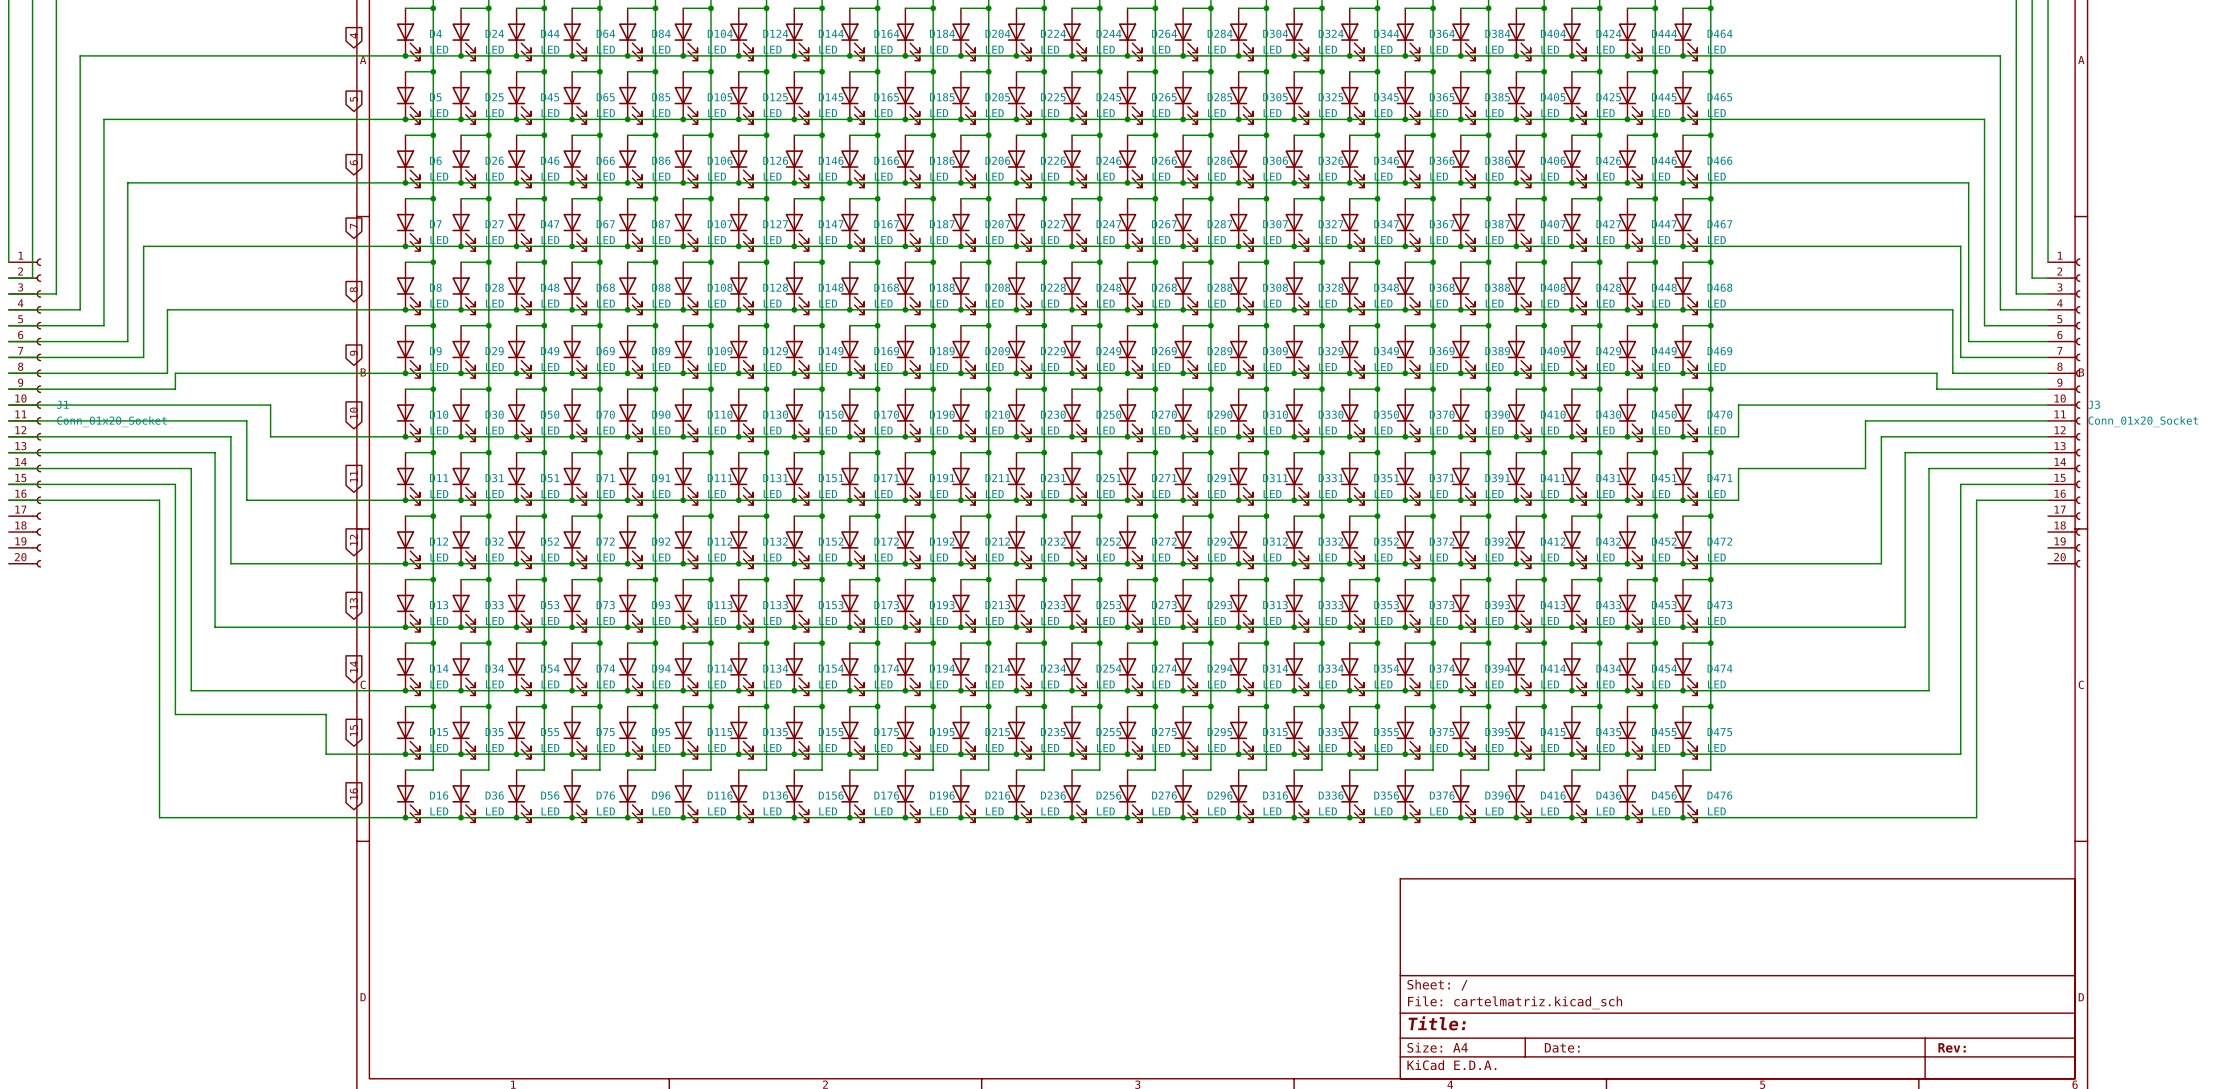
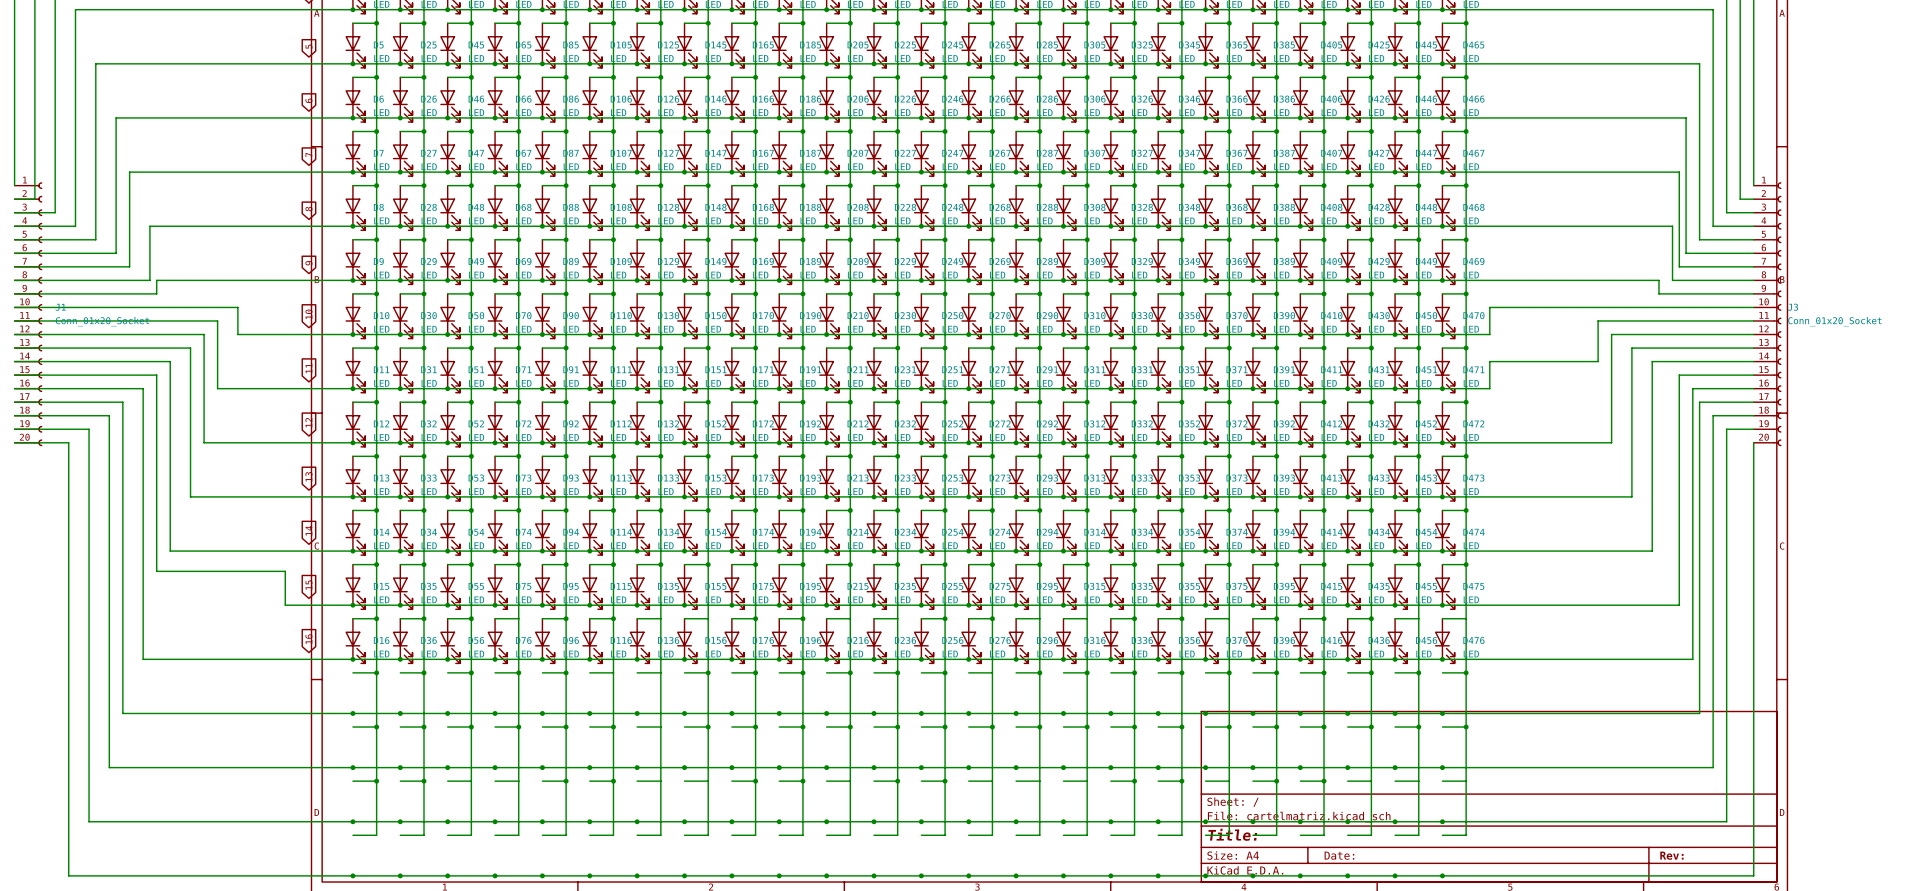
wire: none -> (14, 402) (122, 402) (122, 713) (1699, 713) (1699, 402) (1753, 402)
wire: none -> (14, 415) (109, 415) (109, 767) (1713, 767) (1713, 415) (1753, 415)
wire: none -> (14, 429) (89, 429) (89, 821) (1726, 821) (1726, 429) (1753, 429)
wire: none -> (14, 442) (68, 442) (68, 875) (1753, 875) (1753, 442)
wire: none -> (376, 618) (376, 835) (352, 835)
junction: none -> (376, 618)
wire: none -> (423, 618) (423, 835) (400, 835)
junction: none -> (423, 618)
wire: none -> (471, 618) (471, 835) (447, 835)
junction: none -> (471, 618)
wire: none -> (518, 618) (518, 835) (495, 835)
wire: none -> (566, 618) (566, 835) (542, 835)
junction: none -> (566, 618)
wire: none -> (613, 618) (613, 835) (589, 835)
junction: none -> (613, 618)
wire: none -> (660, 618) (660, 835) (637, 835)
wire: none -> (708, 618) (708, 835) (684, 835)
wire: none -> (755, 618) (755, 835) (731, 835)
junction: none -> (755, 618)
wire: none -> (802, 618) (802, 835) (779, 835)
junction: none -> (802, 618)
wire: none -> (850, 618) (850, 835) (826, 835)
wire: none -> (897, 618) (897, 835) (874, 835)
wire: none -> (945, 618) (945, 835) (921, 835)
junction: none -> (945, 618)
wire: none -> (992, 618) (992, 835) (968, 835)
junction: none -> (992, 618)
wire: none -> (1039, 618) (1039, 835) (1016, 835)
wire: none -> (1087, 618) (1087, 835) (1063, 835)
wire: none -> (1134, 618) (1134, 835) (1110, 835)
junction: none -> (1134, 618)
wire: none -> (1181, 618) (1181, 835) (1158, 835)
junction: none -> (1181, 618)
wire: none -> (1229, 618) (1229, 835) (1205, 835)
wire: none -> (1276, 618) (1276, 835) (1252, 835)
junction: none -> (1276, 618)
wire: none -> (1324, 618) (1324, 835) (1300, 835)
junction: none -> (1324, 618)
wire: none -> (1371, 618) (1371, 835) (1347, 835)
junction: none -> (1371, 618)
wire: none -> (1418, 618) (1418, 835) (1395, 835)
wire: none -> (1466, 618) (1466, 835) (1442, 835)
wire: none -> (352, 672) (376, 672)
junction: none -> (376, 672)
wire: none -> (400, 672) (423, 672)
junction: none -> (423, 672)
wire: none -> (447, 672) (471, 672)
junction: none -> (471, 672)
wire: none -> (495, 672) (518, 672)
junction: none -> (518, 672)
wire: none -> (542, 672) (566, 672)
junction: none -> (566, 672)
wire: none -> (589, 672) (613, 672)
wire: none -> (637, 672) (660, 672)
wire: none -> (684, 672) (708, 672)
junction: none -> (708, 672)
wire: none -> (731, 672) (755, 672)
junction: none -> (755, 672)
wire: none -> (779, 672) (802, 672)
junction: none -> (802, 672)
wire: none -> (826, 672) (850, 672)
junction: none -> (850, 672)
wire: none -> (874, 672) (897, 672)
junction: none -> (897, 672)
wire: none -> (921, 672) (945, 672)
junction: none -> (945, 672)
wire: none -> (968, 672) (992, 672)
wire: none -> (1016, 672) (1039, 672)
junction: none -> (1039, 672)
wire: none -> (1063, 672) (1087, 672)
junction: none -> (1087, 672)
wire: none -> (1110, 672) (1134, 672)
junction: none -> (1134, 672)
wire: none -> (1158, 672) (1181, 672)
junction: none -> (1181, 672)
wire: none -> (1205, 672) (1229, 672)
junction: none -> (1229, 672)
wire: none -> (1252, 672) (1276, 672)
junction: none -> (1276, 672)
wire: none -> (1300, 672) (1324, 672)
junction: none -> (1324, 672)
wire: none -> (1347, 672) (1371, 672)
junction: none -> (1371, 672)
wire: none -> (1395, 672) (1418, 672)
junction: none -> (1418, 672)
wire: none -> (1442, 672) (1466, 672)
junction: none -> (1466, 672)
junction: none -> (352, 713)
junction: none -> (400, 713)
junction: none -> (447, 713)
junction: none -> (495, 713)
junction: none -> (542, 713)
junction: none -> (589, 713)
junction: none -> (637, 713)
junction: none -> (684, 713)
junction: none -> (731, 713)
junction: none -> (779, 713)
junction: none -> (826, 713)
junction: none -> (874, 713)
junction: none -> (921, 713)
junction: none -> (968, 713)
junction: none -> (1016, 713)
junction: none -> (1063, 713)
junction: none -> (1110, 713)
junction: none -> (1158, 713)
junction: none -> (1205, 713)
junction: none -> (1252, 713)
junction: none -> (1300, 713)
junction: none -> (1347, 713)
junction: none -> (1395, 713)
junction: none -> (1442, 713)
wire: none -> (352, 727) (376, 727)
junction: none -> (376, 727)
wire: none -> (400, 727) (423, 727)
junction: none -> (423, 727)
wire: none -> (447, 727) (471, 727)
junction: none -> (471, 727)
wire: none -> (495, 727) (518, 727)
junction: none -> (518, 727)
wire: none -> (542, 727) (566, 727)
junction: none -> (566, 727)
wire: none -> (589, 727) (613, 727)
junction: none -> (613, 727)
wire: none -> (637, 727) (660, 727)
wire: none -> (684, 727) (708, 727)
junction: none -> (708, 727)
wire: none -> (731, 727) (755, 727)
junction: none -> (755, 727)
wire: none -> (779, 727) (802, 727)
junction: none -> (802, 727)
wire: none -> (826, 727) (850, 727)
junction: none -> (850, 727)
wire: none -> (874, 727) (897, 727)
junction: none -> (897, 727)
wire: none -> (921, 727) (945, 727)
junction: none -> (945, 727)
wire: none -> (968, 727) (992, 727)
junction: none -> (992, 727)
wire: none -> (1016, 727) (1039, 727)
junction: none -> (1039, 727)
wire: none -> (1063, 727) (1087, 727)
junction: none -> (1087, 727)
wire: none -> (1110, 727) (1134, 727)
junction: none -> (1134, 727)
wire: none -> (1158, 727) (1181, 727)
junction: none -> (1181, 727)
wire: none -> (1205, 727) (1229, 727)
junction: none -> (1229, 727)
wire: none -> (1252, 727) (1276, 727)
junction: none -> (1276, 727)
wire: none -> (1300, 727) (1324, 727)
junction: none -> (1324, 727)
wire: none -> (1347, 727) (1371, 727)
junction: none -> (1371, 727)
wire: none -> (1395, 727) (1418, 727)
junction: none -> (1418, 727)
wire: none -> (1442, 727) (1466, 727)
junction: none -> (1466, 727)
junction: none -> (352, 767)
junction: none -> (400, 767)
junction: none -> (447, 767)
junction: none -> (495, 767)
junction: none -> (542, 767)
junction: none -> (589, 767)
junction: none -> (637, 767)
junction: none -> (684, 767)
junction: none -> (731, 767)
junction: none -> (779, 767)
junction: none -> (826, 767)
junction: none -> (874, 767)
junction: none -> (921, 767)
junction: none -> (968, 767)
junction: none -> (1016, 767)
junction: none -> (1063, 767)
junction: none -> (1110, 767)
junction: none -> (1158, 767)
junction: none -> (1205, 767)
junction: none -> (1252, 767)
junction: none -> (1300, 767)
junction: none -> (1347, 767)
junction: none -> (1395, 767)
junction: none -> (1442, 767)
wire: none -> (352, 781) (376, 781)
junction: none -> (376, 781)
wire: none -> (400, 781) (423, 781)
junction: none -> (423, 781)
wire: none -> (447, 781) (471, 781)
wire: none -> (495, 781) (518, 781)
wire: none -> (542, 781) (566, 781)
junction: none -> (566, 781)
wire: none -> (589, 781) (613, 781)
junction: none -> (613, 781)
wire: none -> (637, 781) (660, 781)
wire: none -> (684, 781) (708, 781)
wire: none -> (731, 781) (755, 781)
junction: none -> (755, 781)
wire: none -> (779, 781) (802, 781)
junction: none -> (802, 781)
wire: none -> (826, 781) (850, 781)
wire: none -> (874, 781) (897, 781)
junction: none -> (897, 781)
wire: none -> (921, 781) (945, 781)
junction: none -> (945, 781)
wire: none -> (968, 781) (992, 781)
wire: none -> (1016, 781) (1039, 781)
wire: none -> (1063, 781) (1087, 781)
wire: none -> (1110, 781) (1134, 781)
junction: none -> (1134, 781)
wire: none -> (1158, 781) (1181, 781)
junction: none -> (1181, 781)
wire: none -> (1205, 781) (1229, 781)
wire: none -> (1252, 781) (1276, 781)
junction: none -> (1276, 781)
wire: none -> (1300, 781) (1324, 781)
junction: none -> (1324, 781)
wire: none -> (1347, 781) (1371, 781)
wire: none -> (1395, 781) (1418, 781)
wire: none -> (1442, 781) (1466, 781)
junction: none -> (352, 821)
junction: none -> (400, 821)
junction: none -> (447, 821)
junction: none -> (495, 821)
junction: none -> (542, 821)
junction: none -> (589, 821)
junction: none -> (637, 821)
junction: none -> (684, 821)
junction: none -> (731, 821)
junction: none -> (779, 821)
junction: none -> (826, 821)
junction: none -> (874, 821)
junction: none -> (921, 821)
junction: none -> (968, 821)
junction: none -> (1016, 821)
junction: none -> (1063, 821)
junction: none -> (1110, 821)
junction: none -> (1158, 821)
junction: none -> (1205, 821)
junction: none -> (1252, 821)
junction: none -> (1300, 821)
junction: none -> (1347, 821)
junction: none -> (1395, 821)
junction: none -> (1442, 821)
junction: none -> (352, 875)
junction: none -> (400, 875)
junction: none -> (447, 875)
junction: none -> (495, 875)
junction: none -> (542, 875)
junction: none -> (589, 875)
junction: none -> (637, 875)
junction: none -> (684, 875)
junction: none -> (731, 875)
junction: none -> (779, 875)
junction: none -> (826, 875)
junction: none -> (874, 875)
junction: none -> (921, 875)
junction: none -> (968, 875)
junction: none -> (1016, 875)
junction: none -> (1063, 875)
junction: none -> (1110, 875)
junction: none -> (1158, 875)
junction: none -> (1205, 875)
junction: none -> (1252, 875)
junction: none -> (1300, 875)
junction: none -> (1347, 875)
junction: none -> (1395, 875)
junction: none -> (1442, 875)

